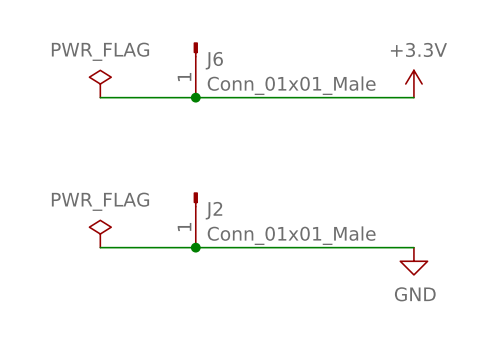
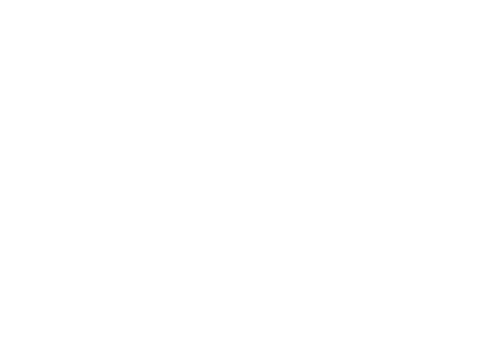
J6: Conn_01x01_Male (195, 69) -> none
power symbol: PWR_FLAG (100, 84) -> none
power symbol: +3.3V (413, 84) -> none
wire: (100, 97) (413, 97) -> none
junction: (195, 97) -> none
J2: Conn_01x01_Male (195, 219) -> none
power symbol: PWR_FLAG (100, 234) -> none
wire: (100, 247) (413, 247) -> none
junction: (195, 247) -> none
power symbol: GND (413, 261) -> none

